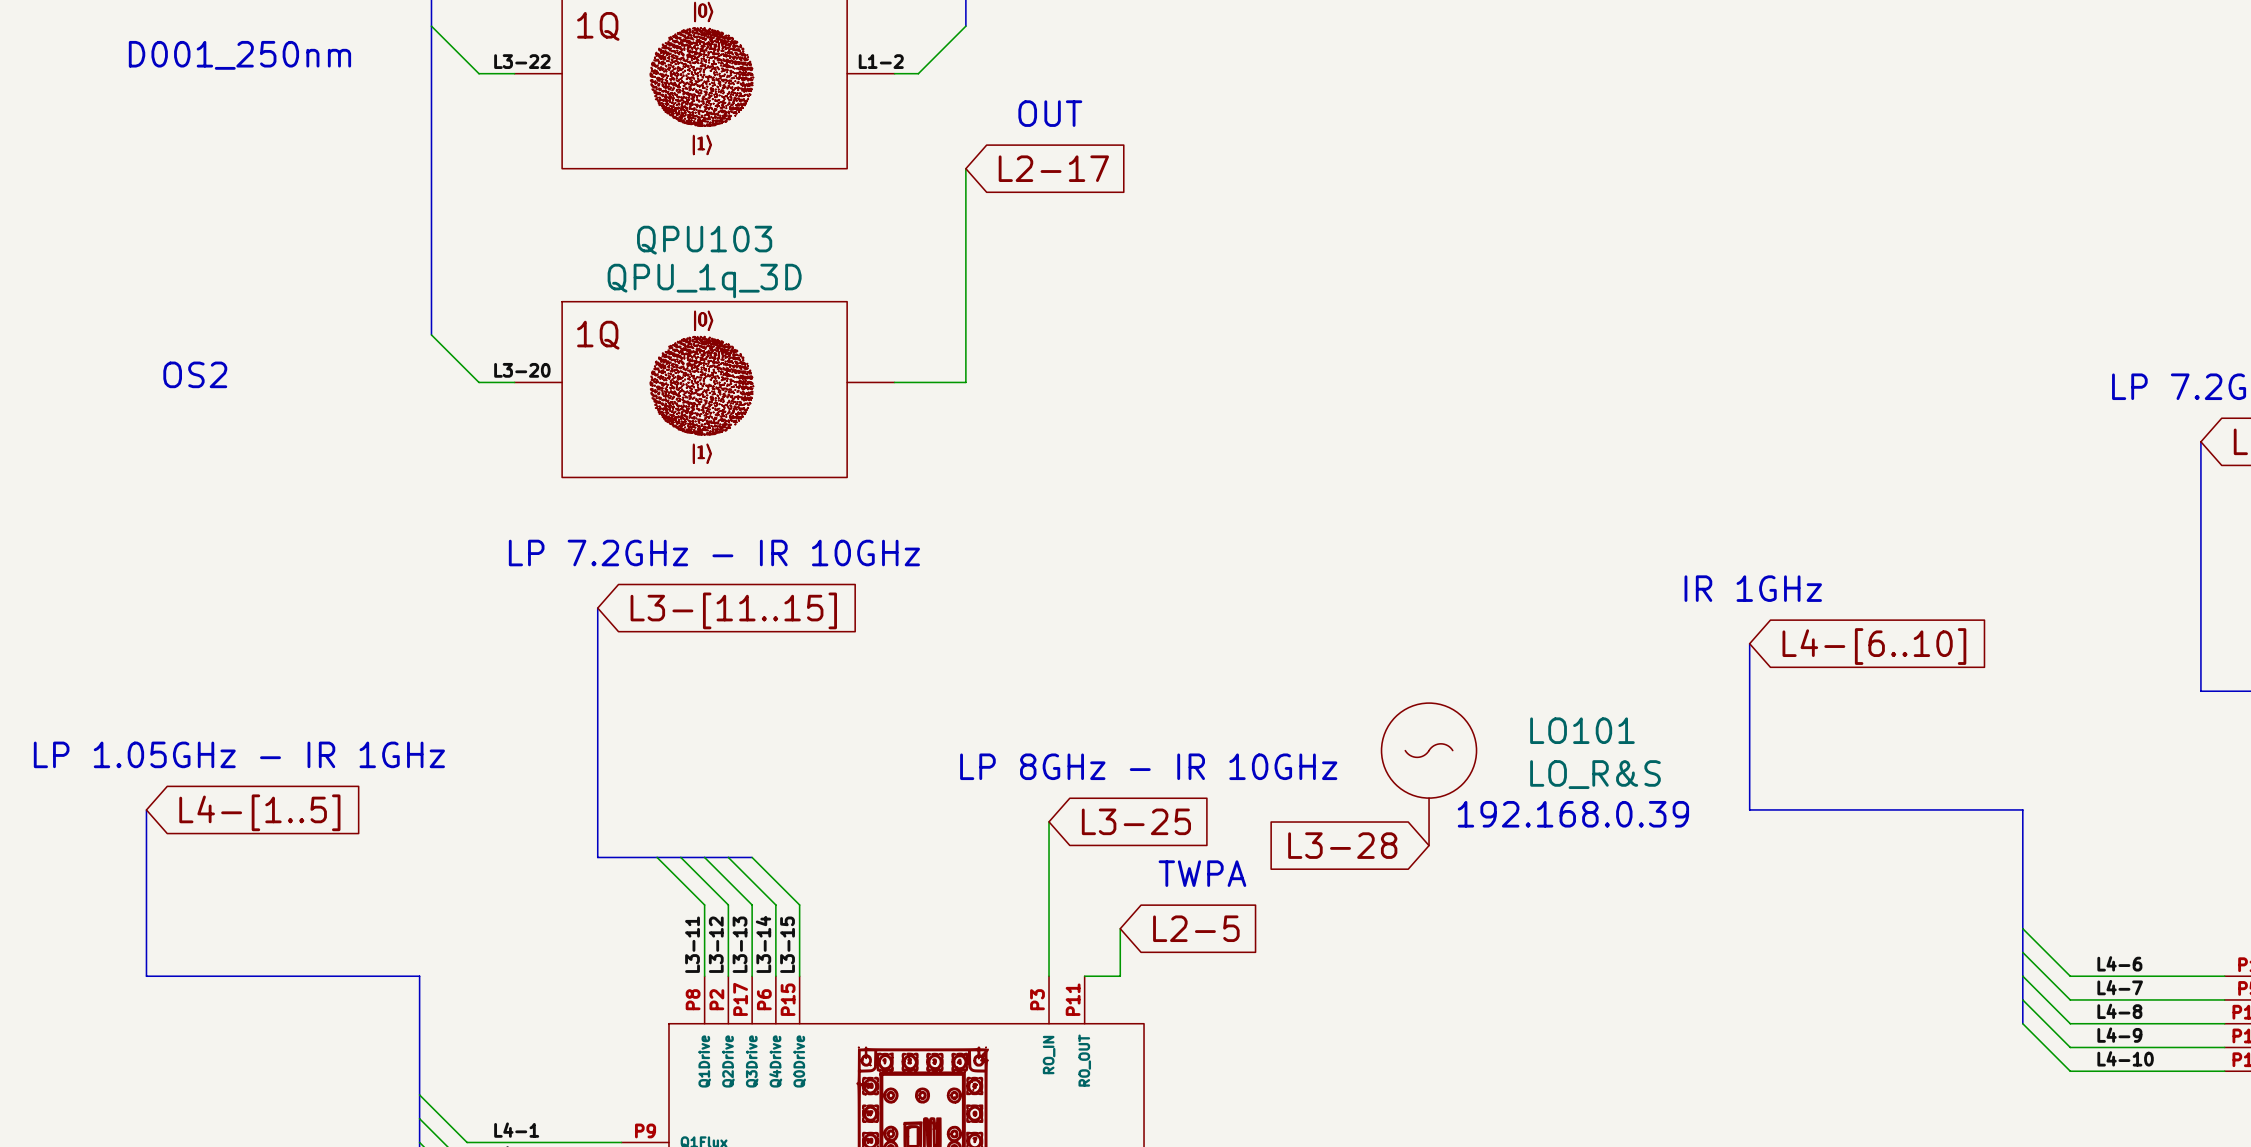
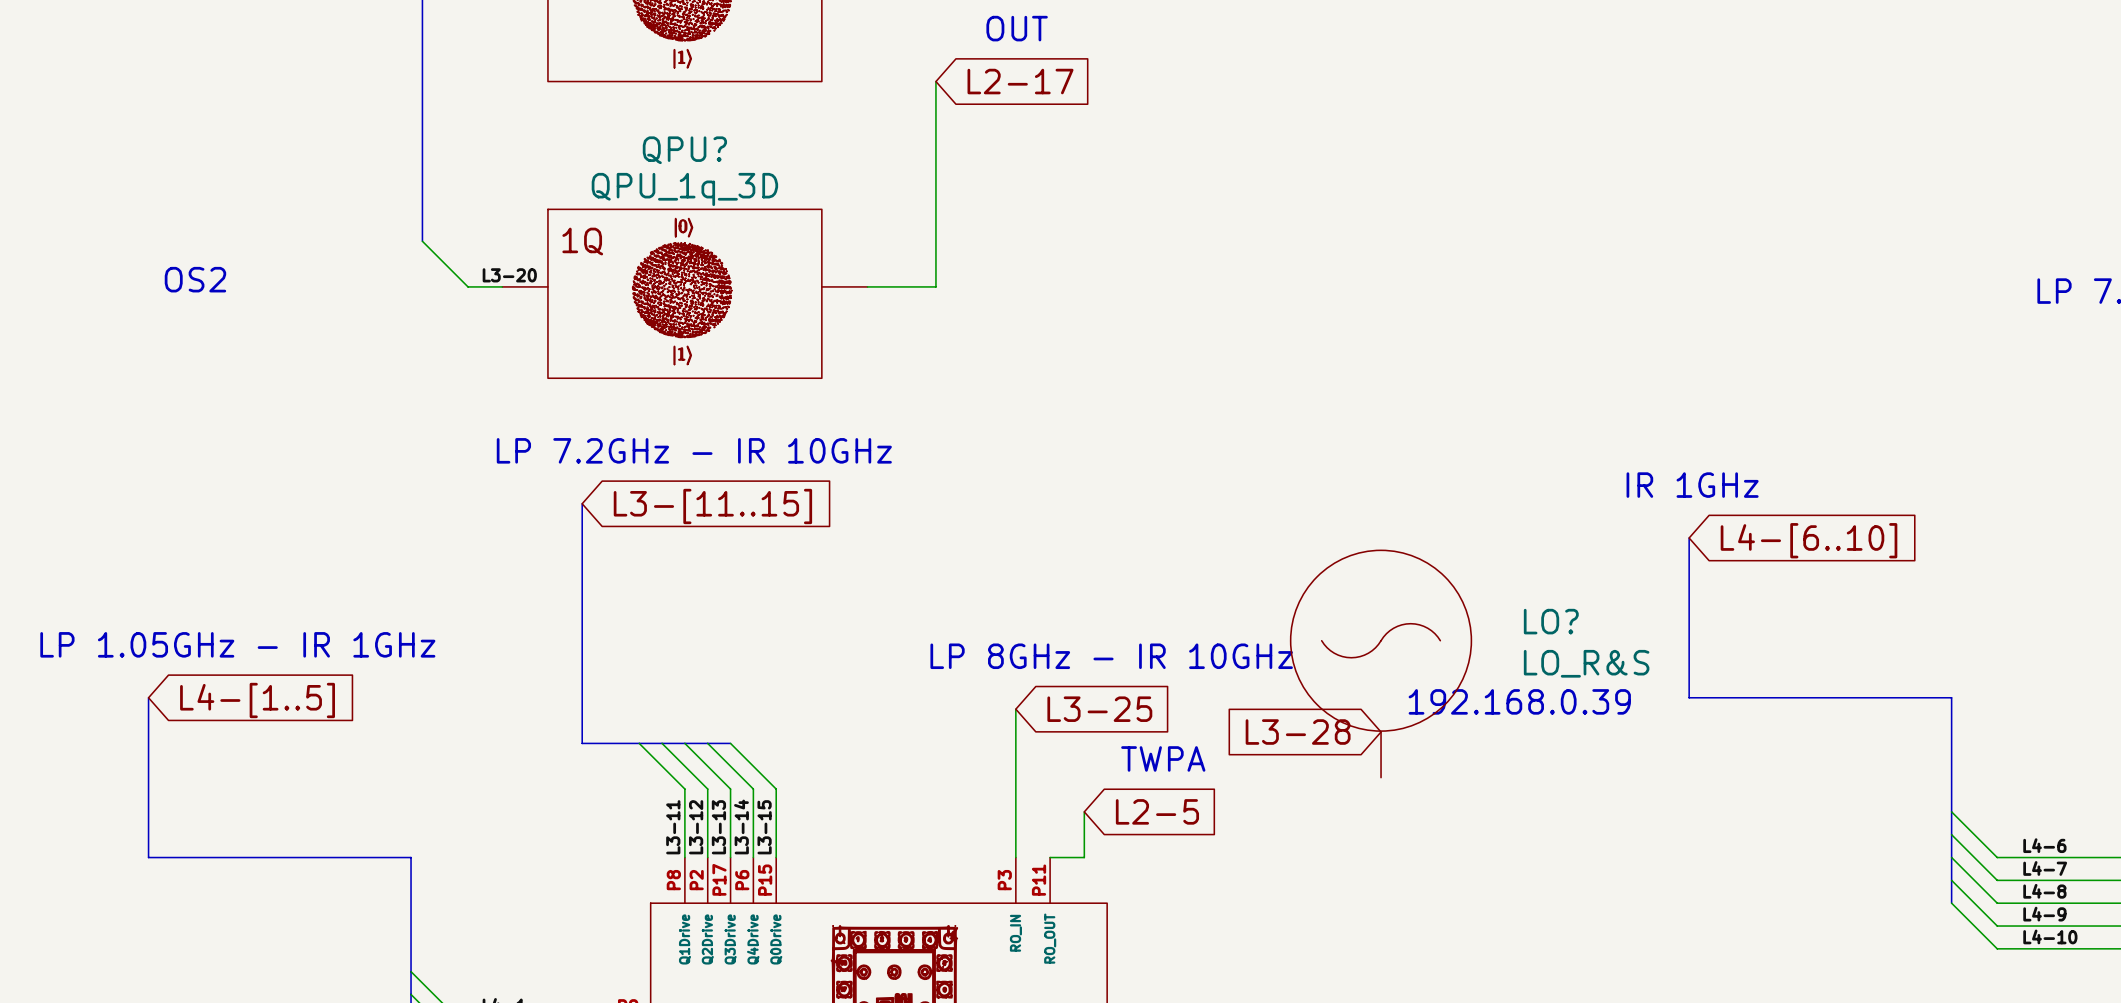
QPU103 name: QPU103 (704, 240) -> QPU? (684, 150)
LO101: LO_R&S (1429, 774) -> none
LO?: none -> LO_R&S (1381, 664)

